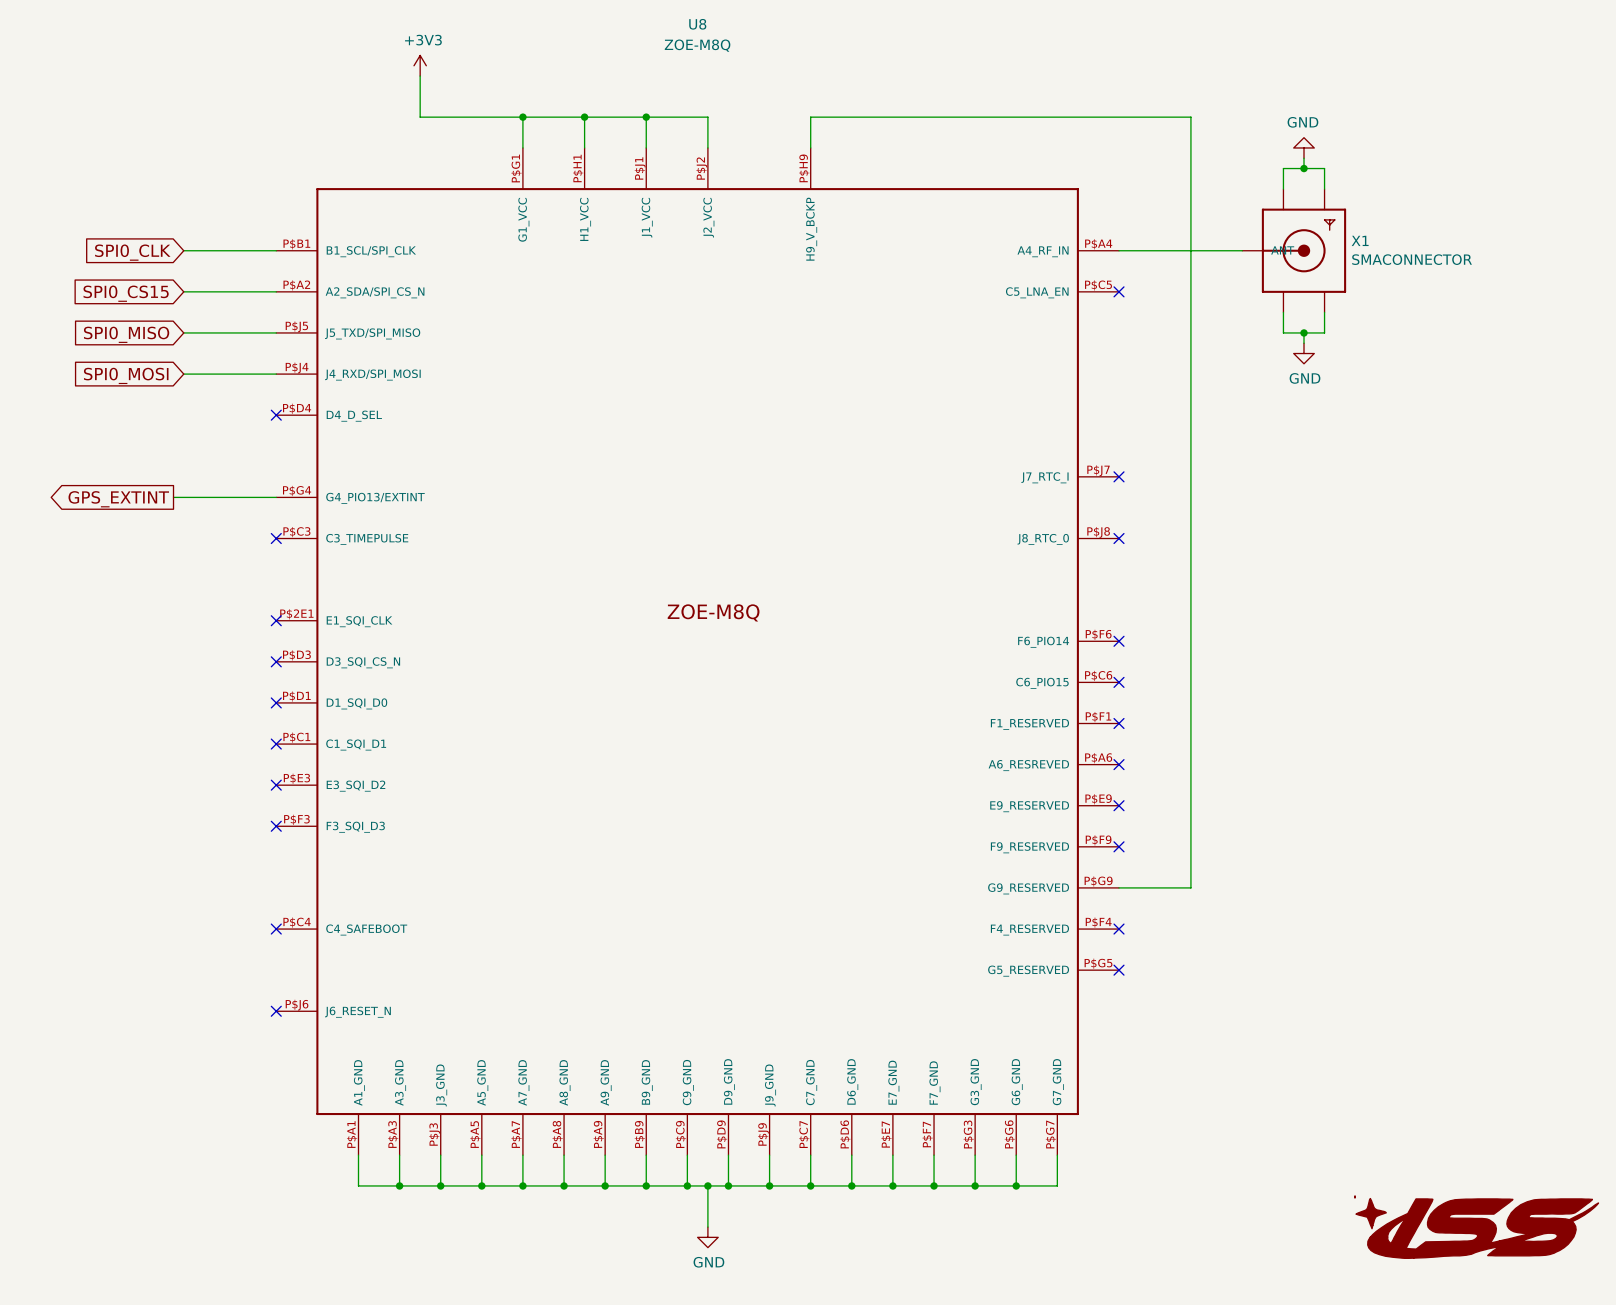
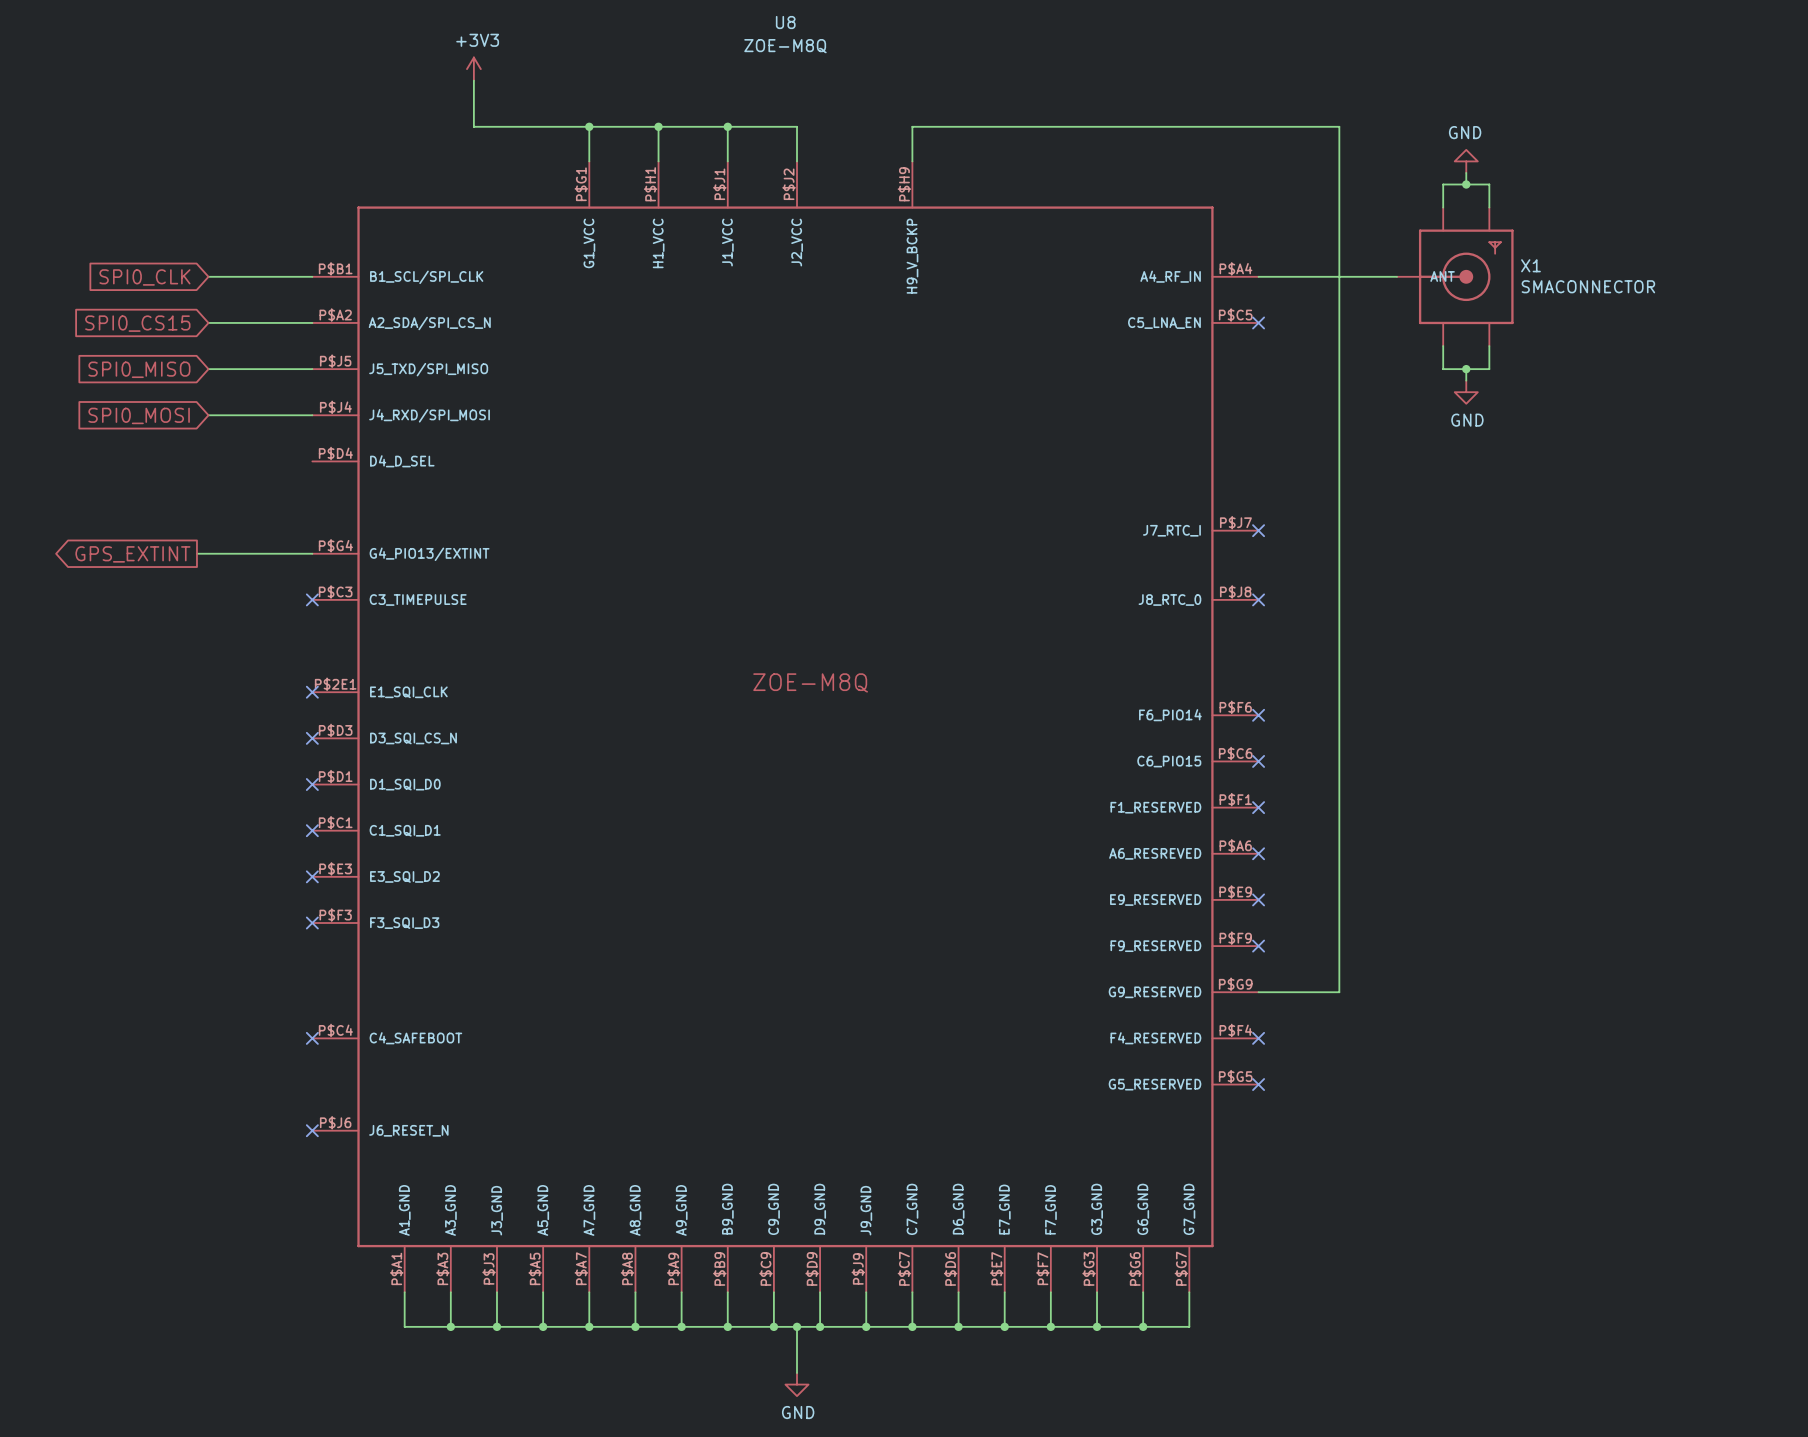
no-connect mark: (276, 415) -> none
power symbol: (1476, 1227) -> none

